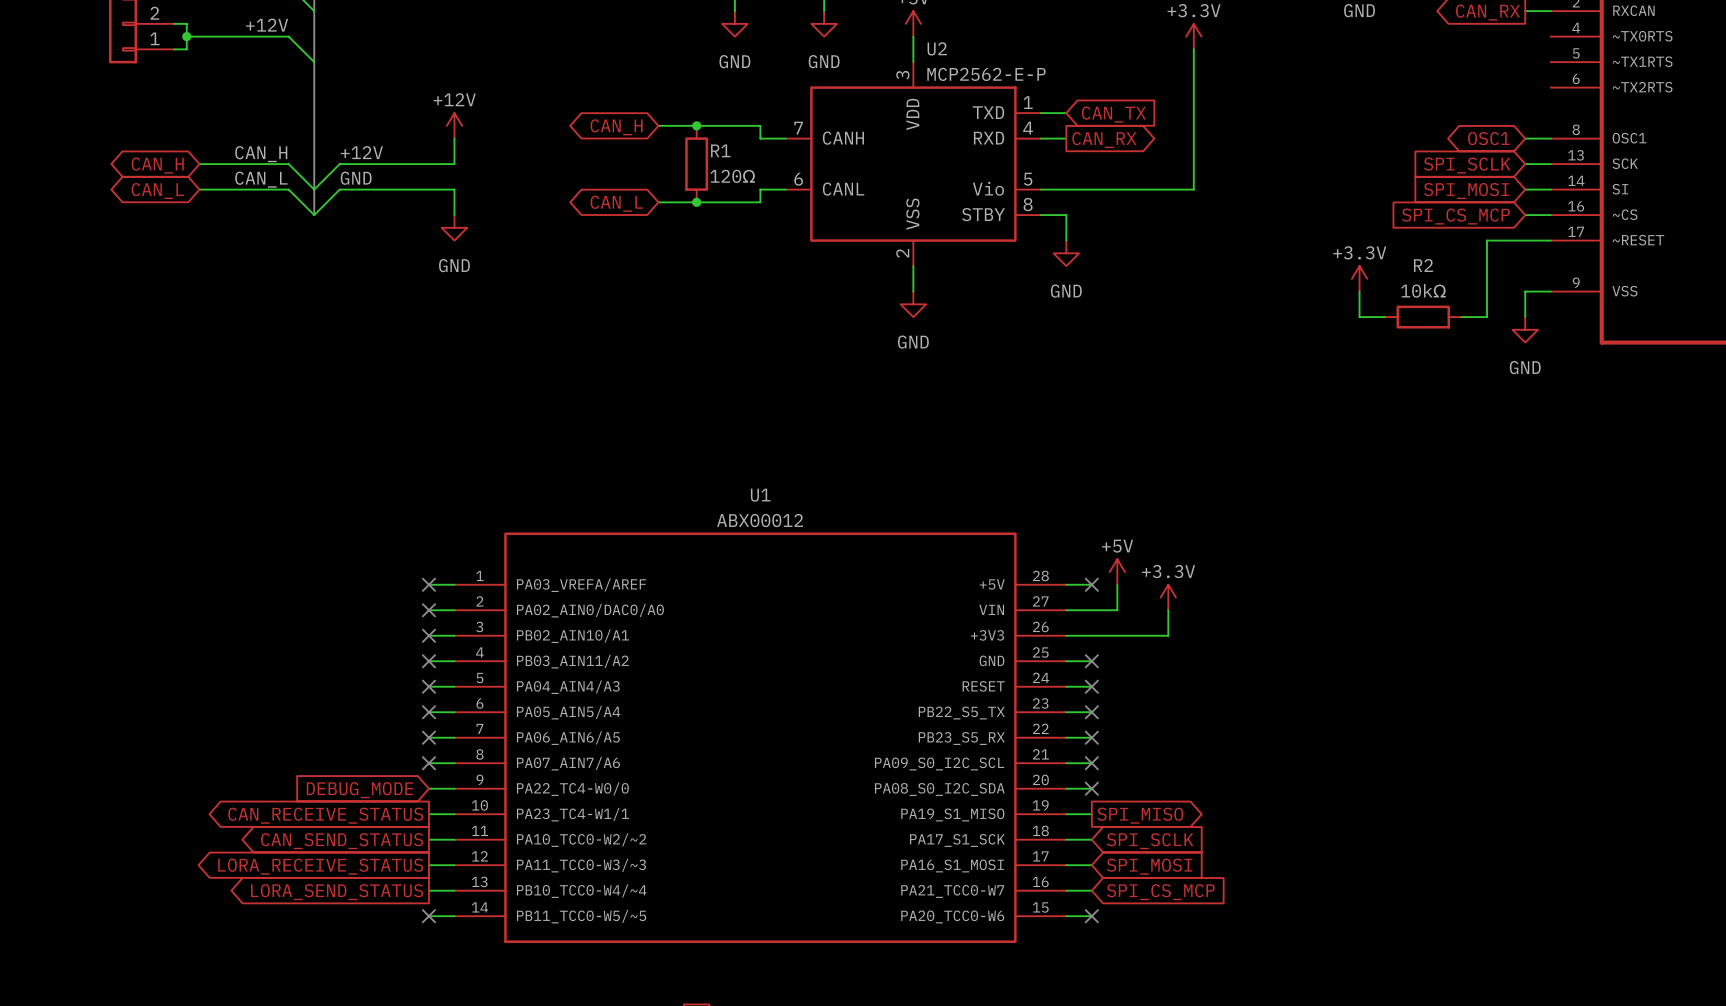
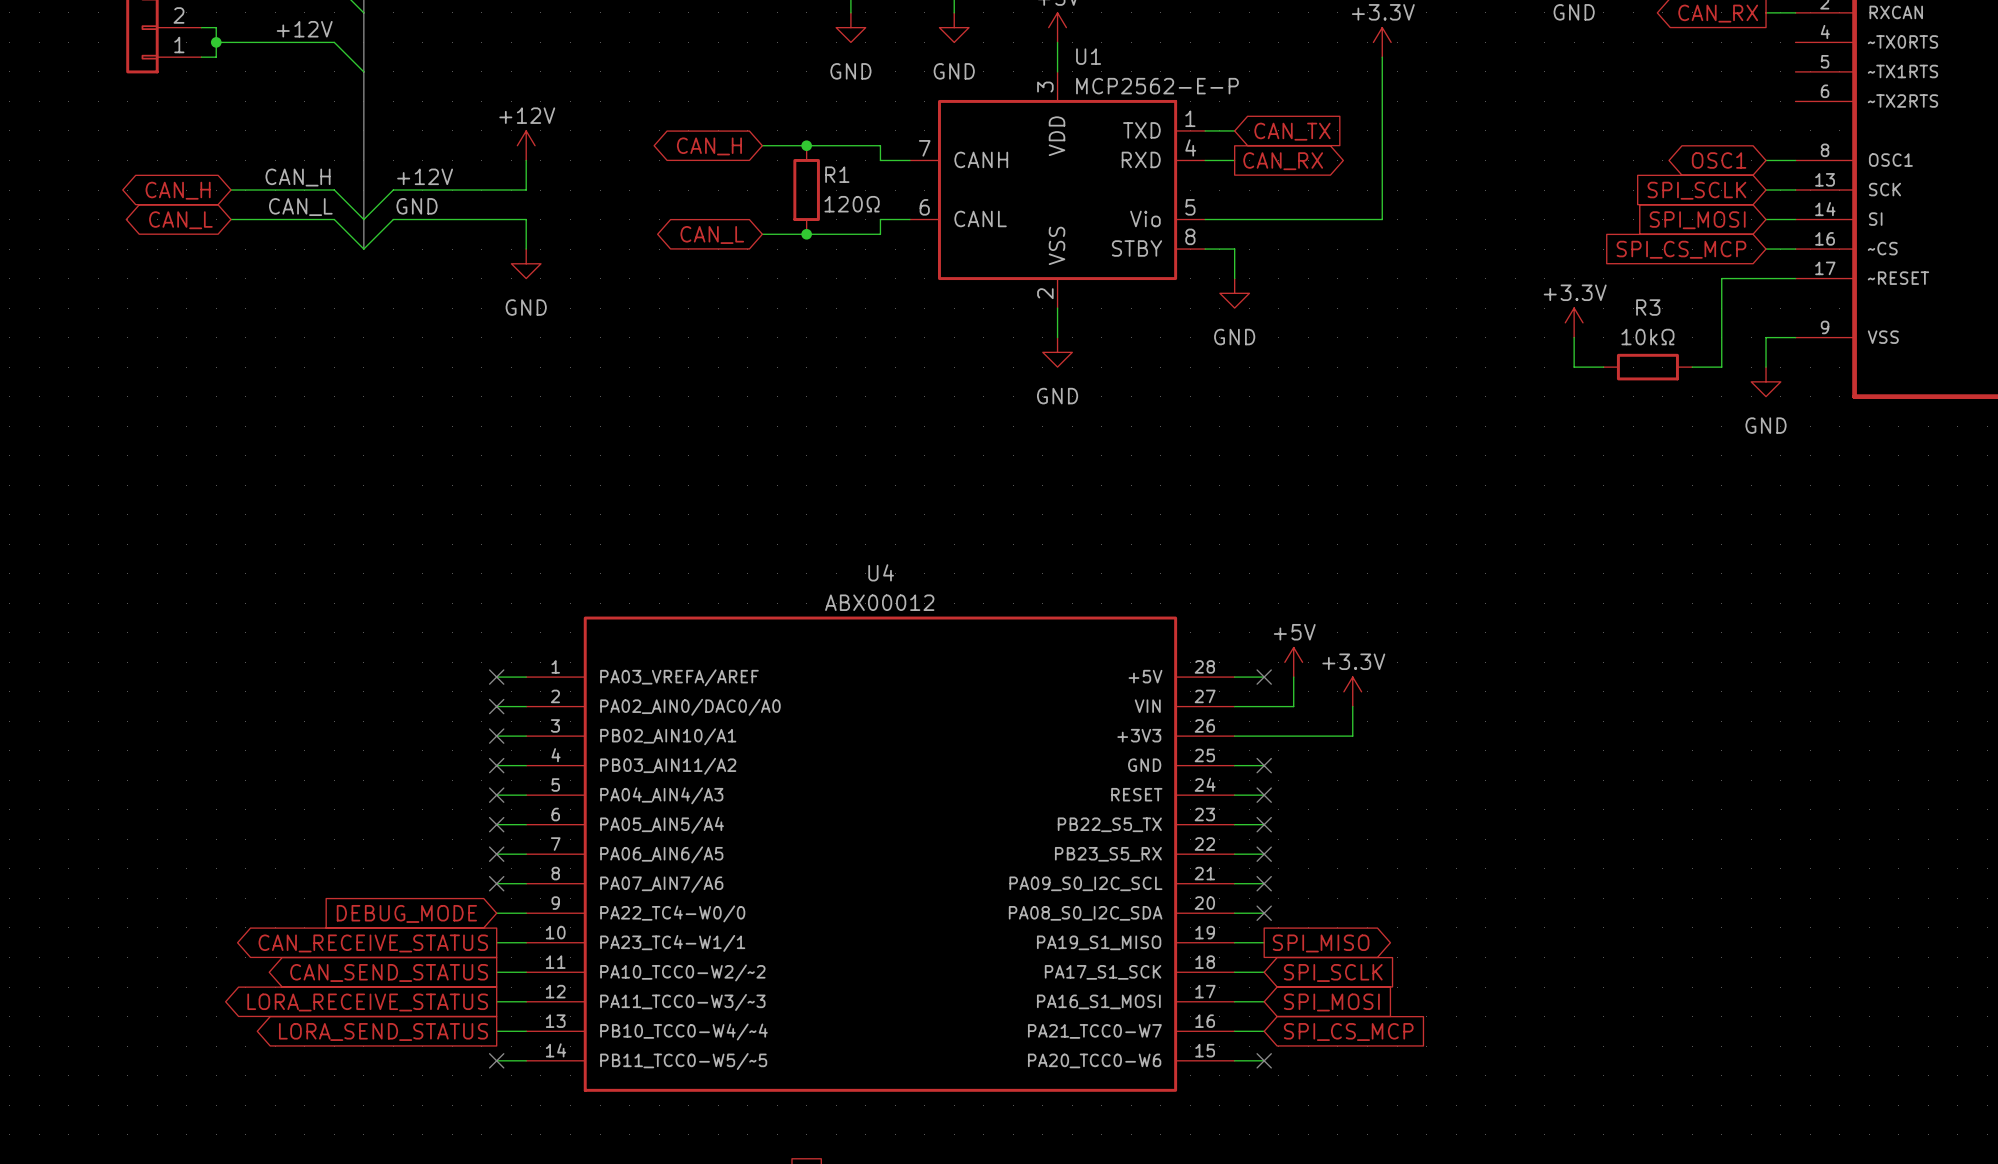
U2 name: U2 (937, 48) -> U1 (1088, 56)
R2 name: R2 (1423, 265) -> R3 (1648, 307)
U1 name: U1 (760, 495) -> U4 (881, 572)

